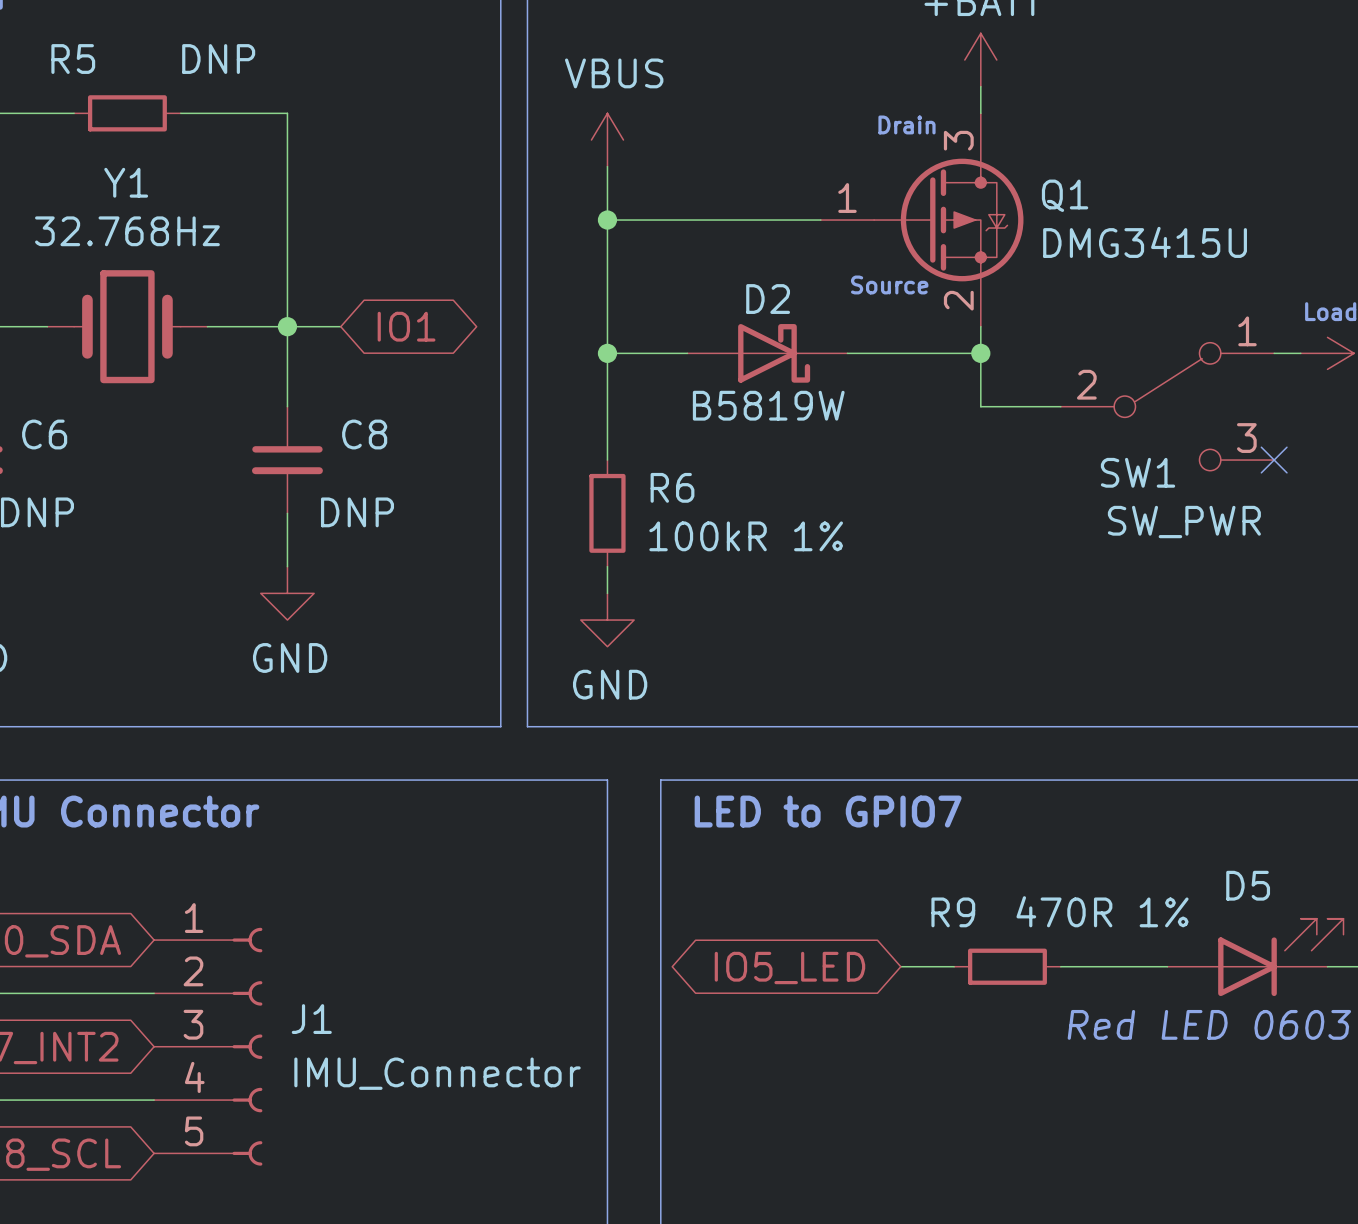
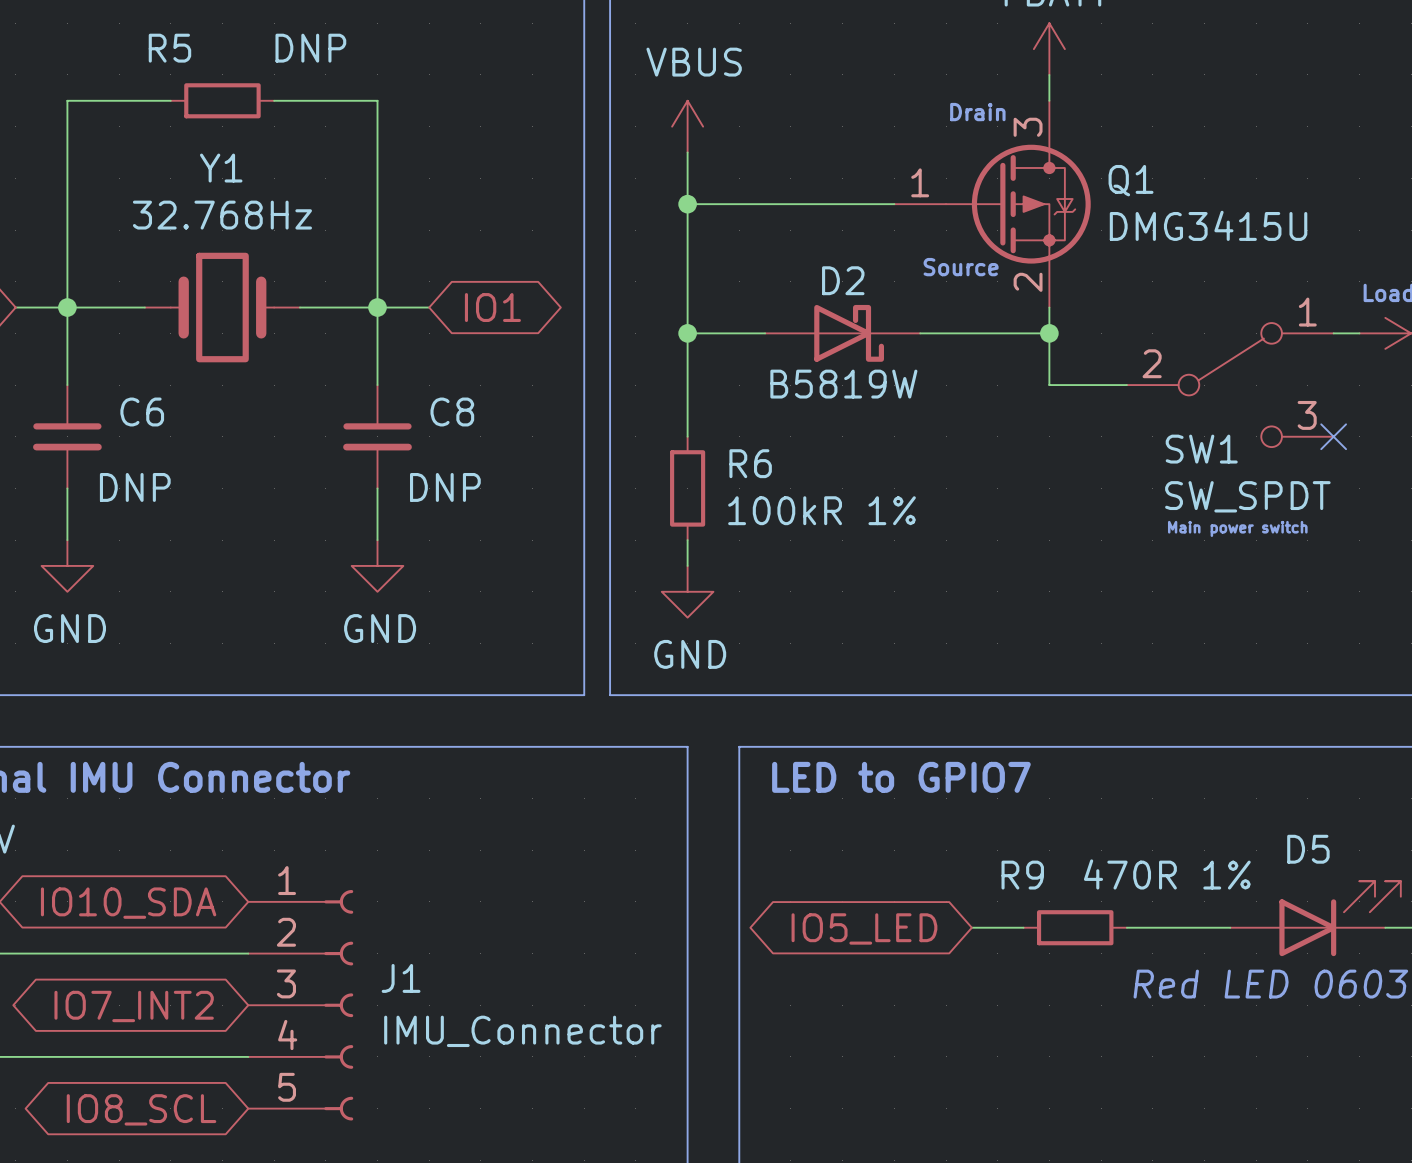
SW1 value: SW_PWR (1184, 522) -> SW_SPDT (1247, 496)
text: none -> Main power switch (1237, 528)

